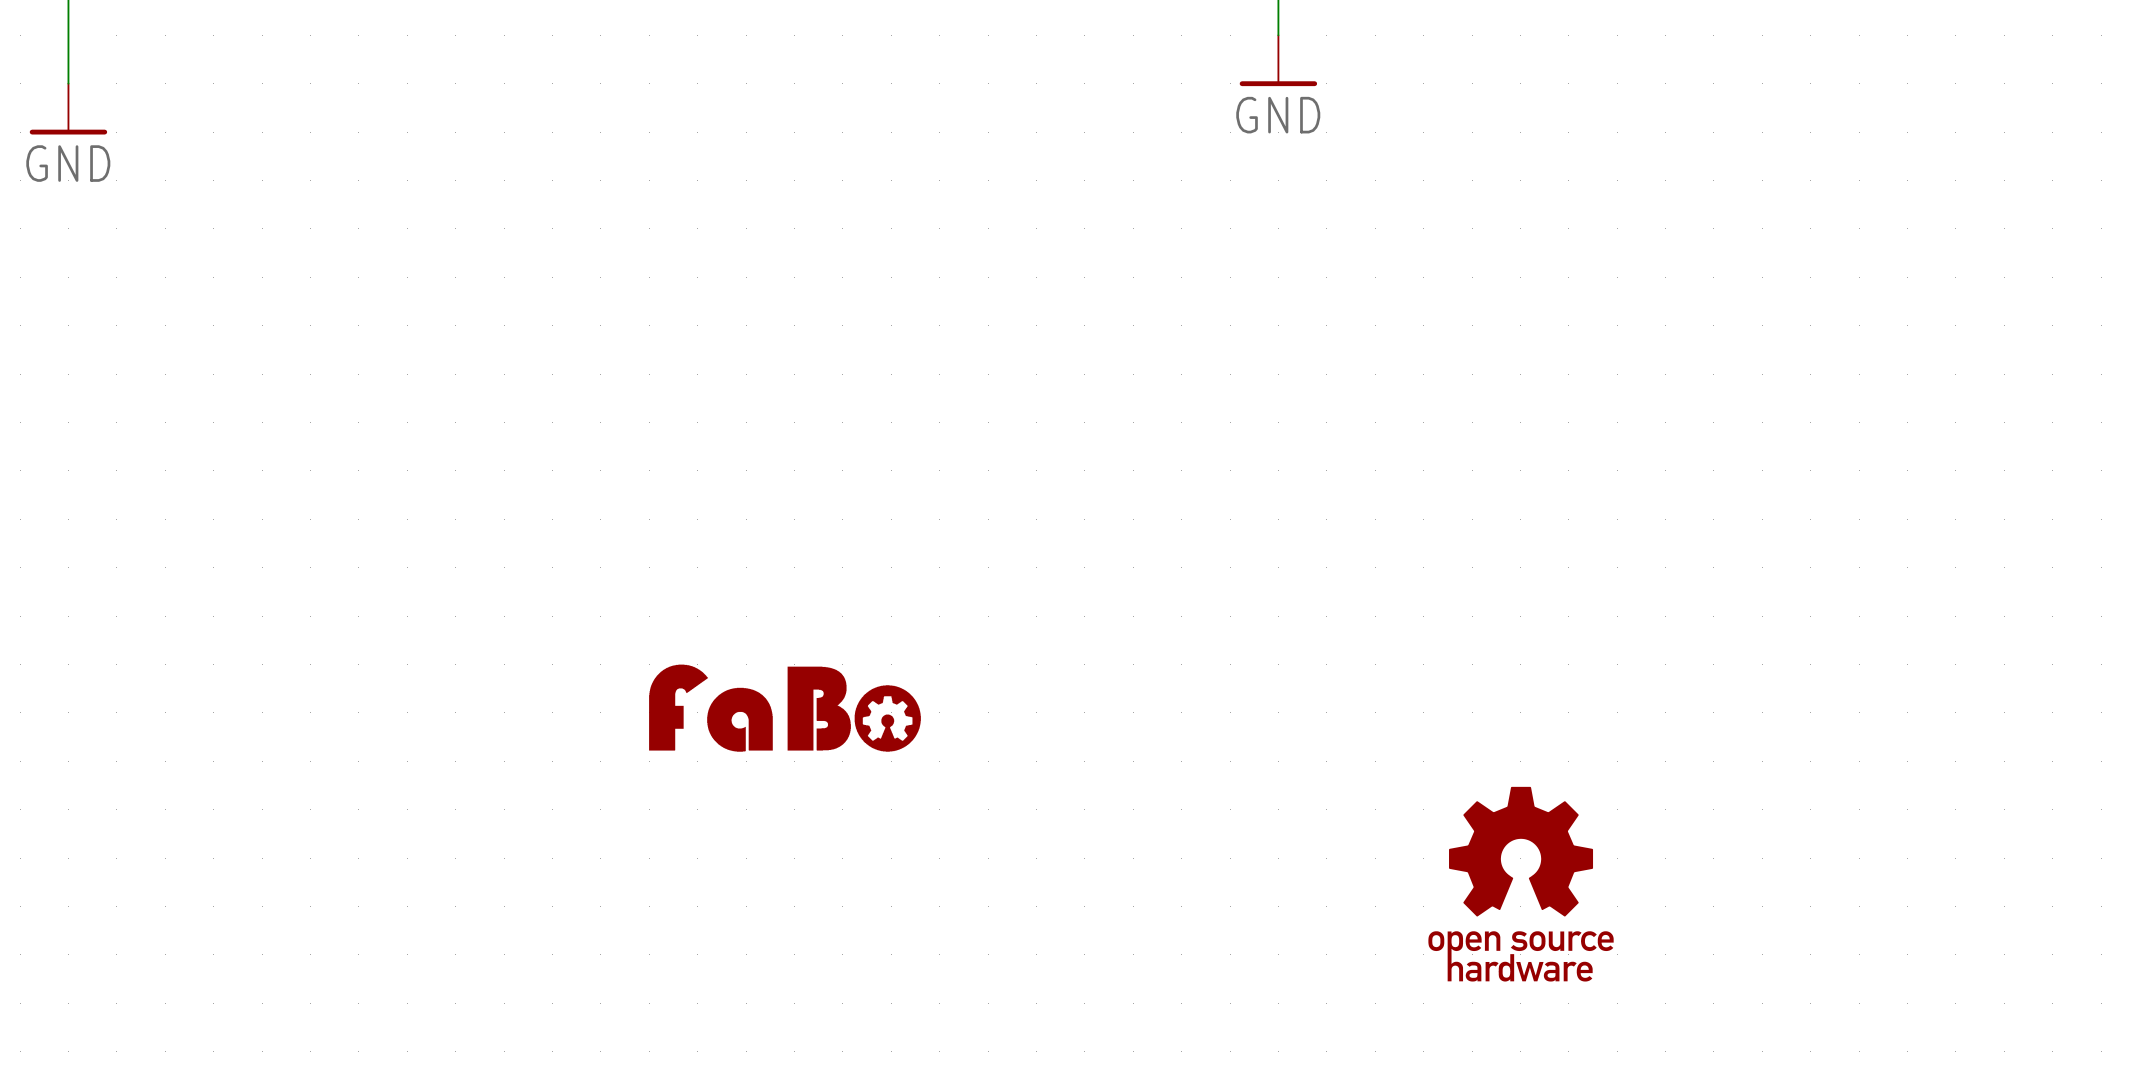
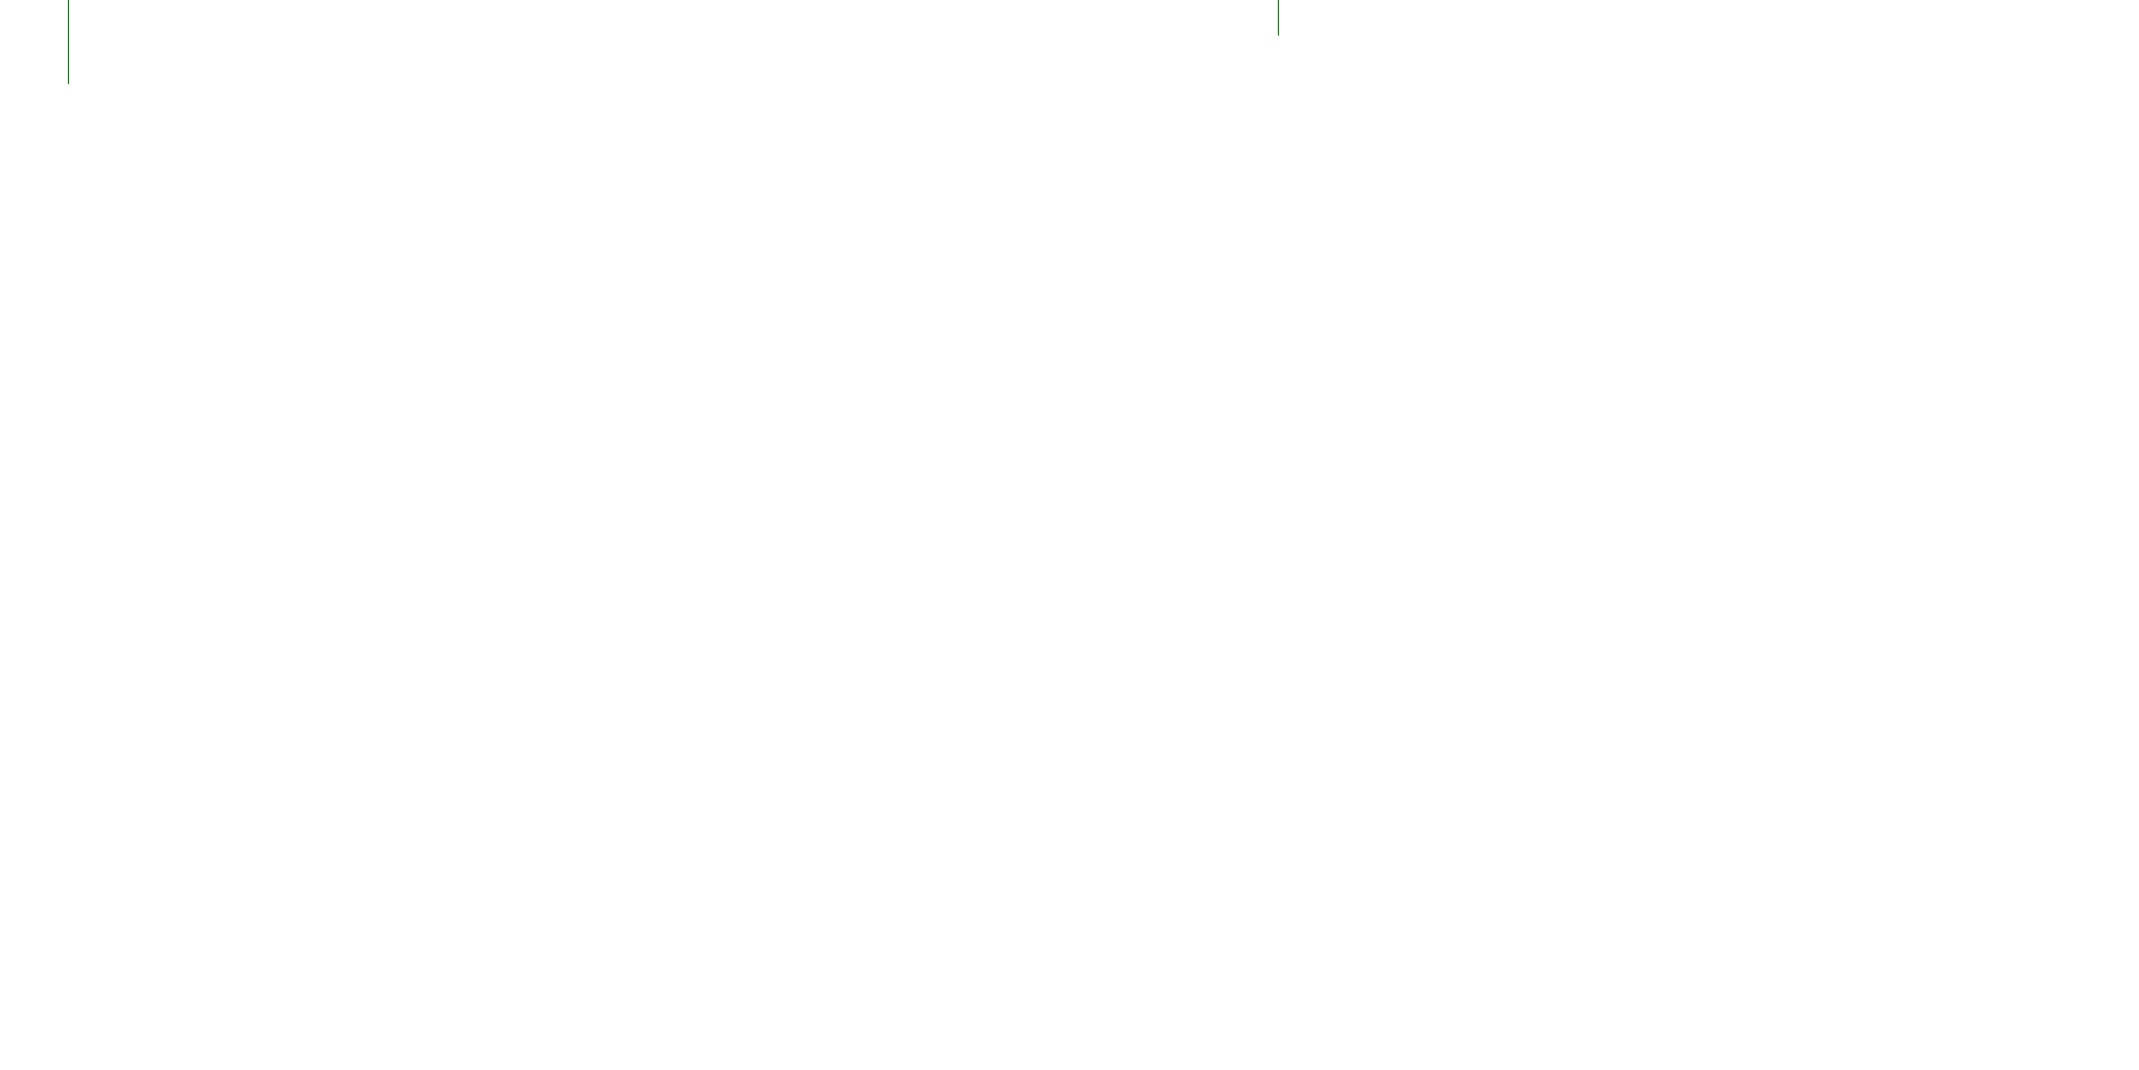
power symbol: GND (1278, 60) -> none
power symbol: GND (68, 109) -> none
part: (784, 708) -> none
part: (1521, 884) -> none

